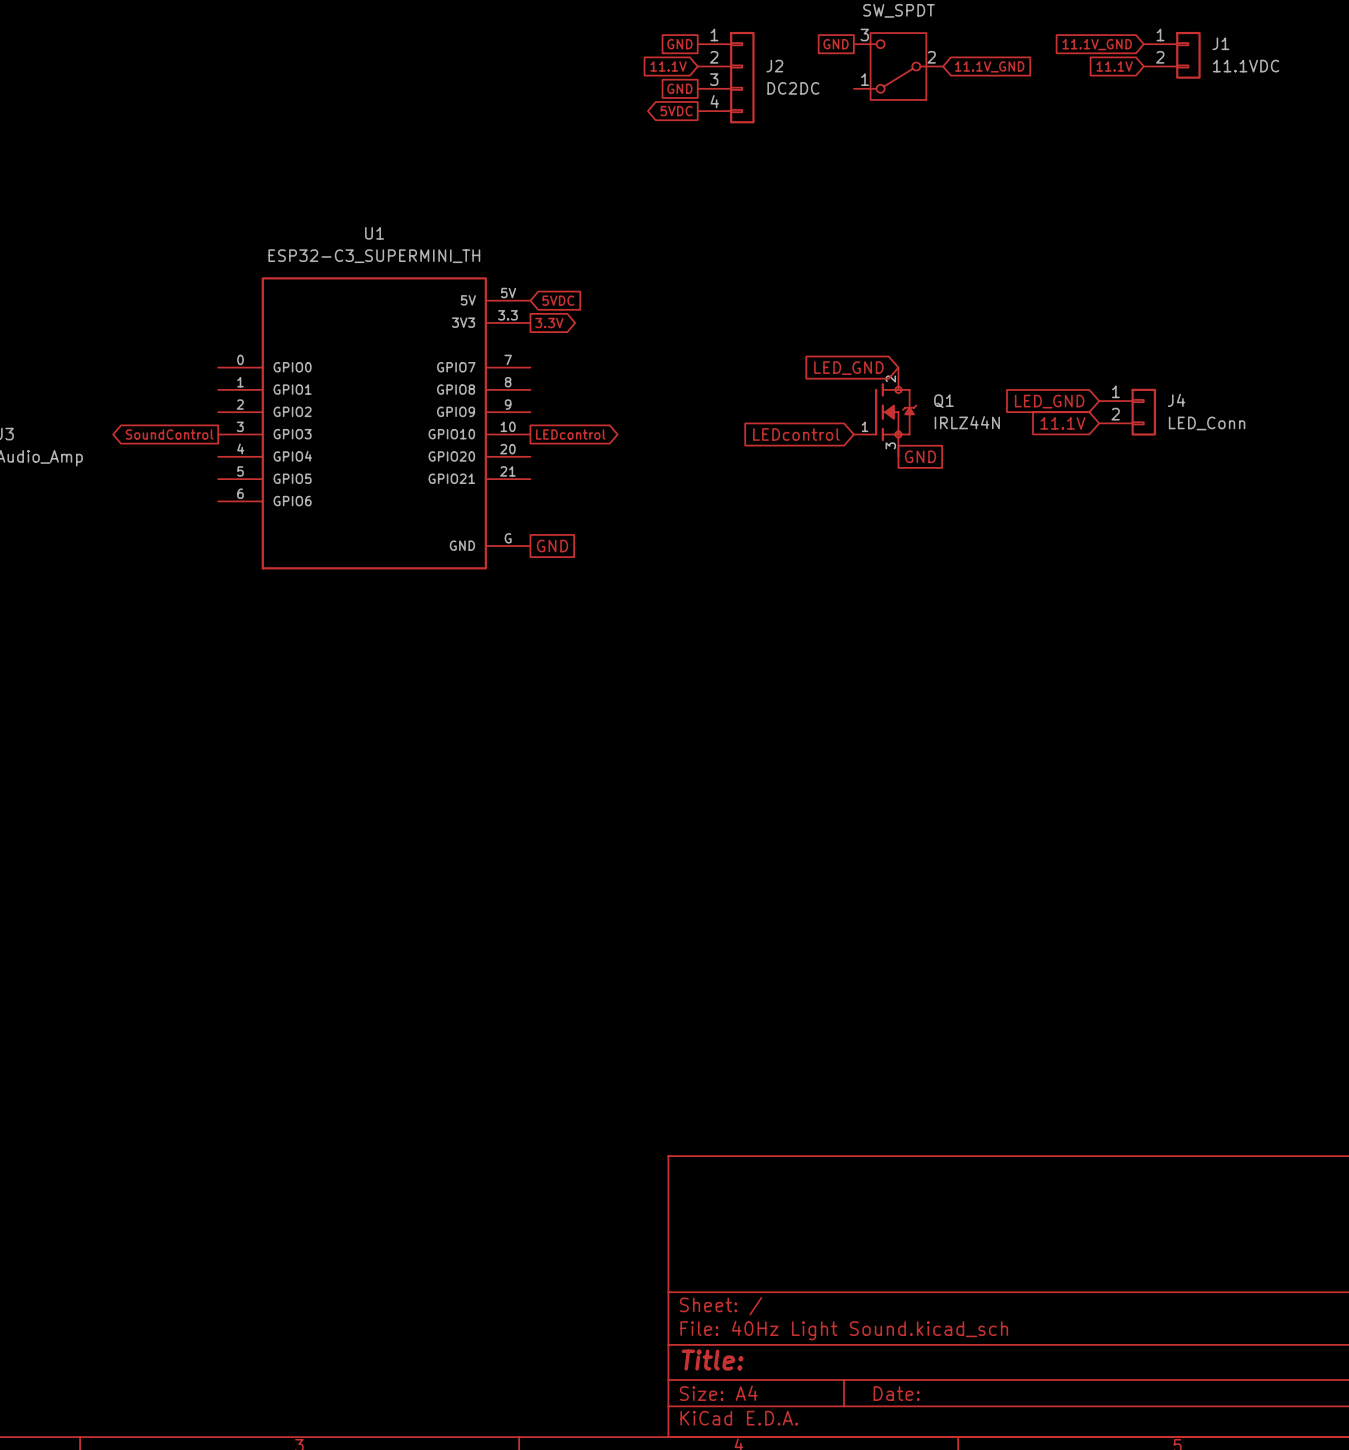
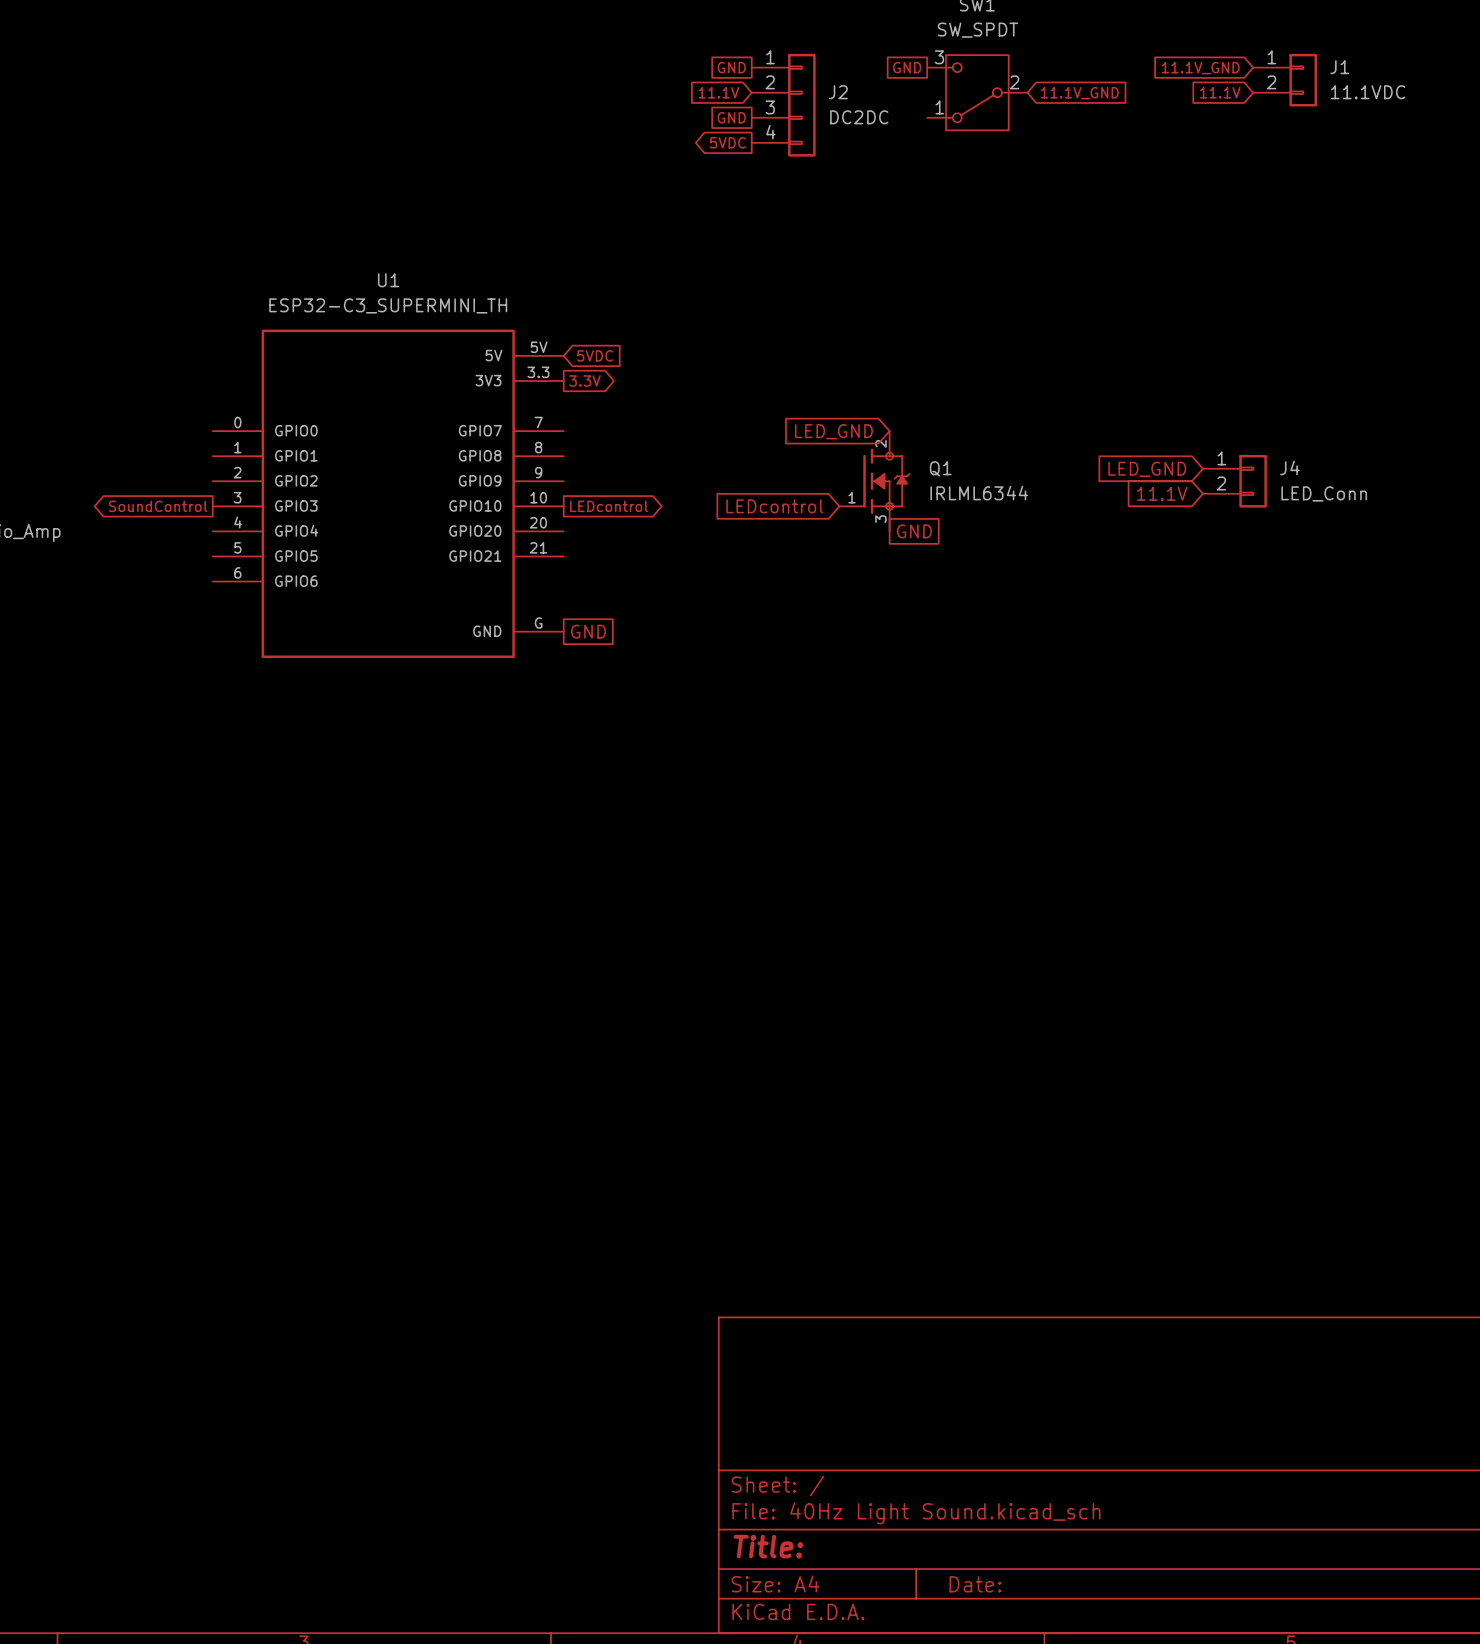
global label position: LED_GND (848, 368) -> LED_GND (833, 431)
Q1 position: (885, 412) -> (874, 481)
Q1 value: IRLZ44N (967, 422) -> IRLML6344 (979, 493)
global label position: LEDcontrol (796, 434) -> LEDcontrol (774, 506)
global label position: GND (920, 456) -> GND (914, 531)

